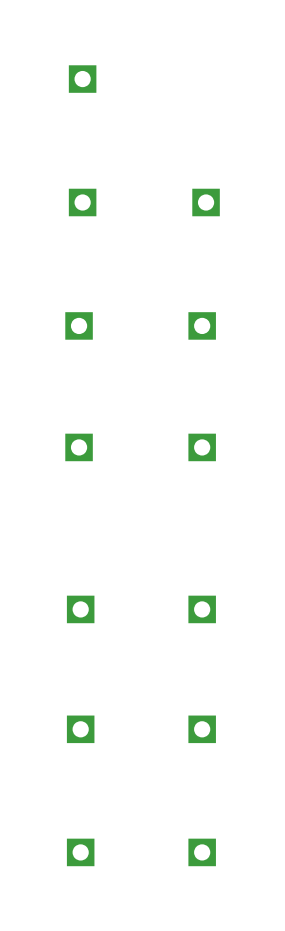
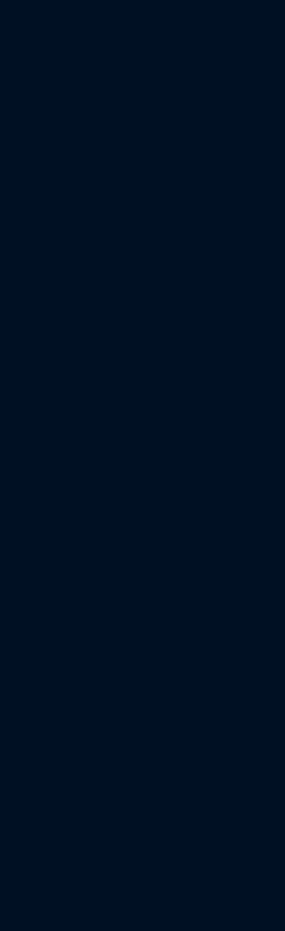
part: (82, 79) -> none
part: (82, 202) -> none
part: (206, 202) -> none
part: (79, 325) -> none
part: (202, 325) -> none
part: (79, 447) -> none
part: (202, 447) -> none
part: (80, 609) -> none
part: (202, 609) -> none
part: (80, 729) -> none
part: (202, 729) -> none
part: (80, 852) -> none
part: (202, 852) -> none

